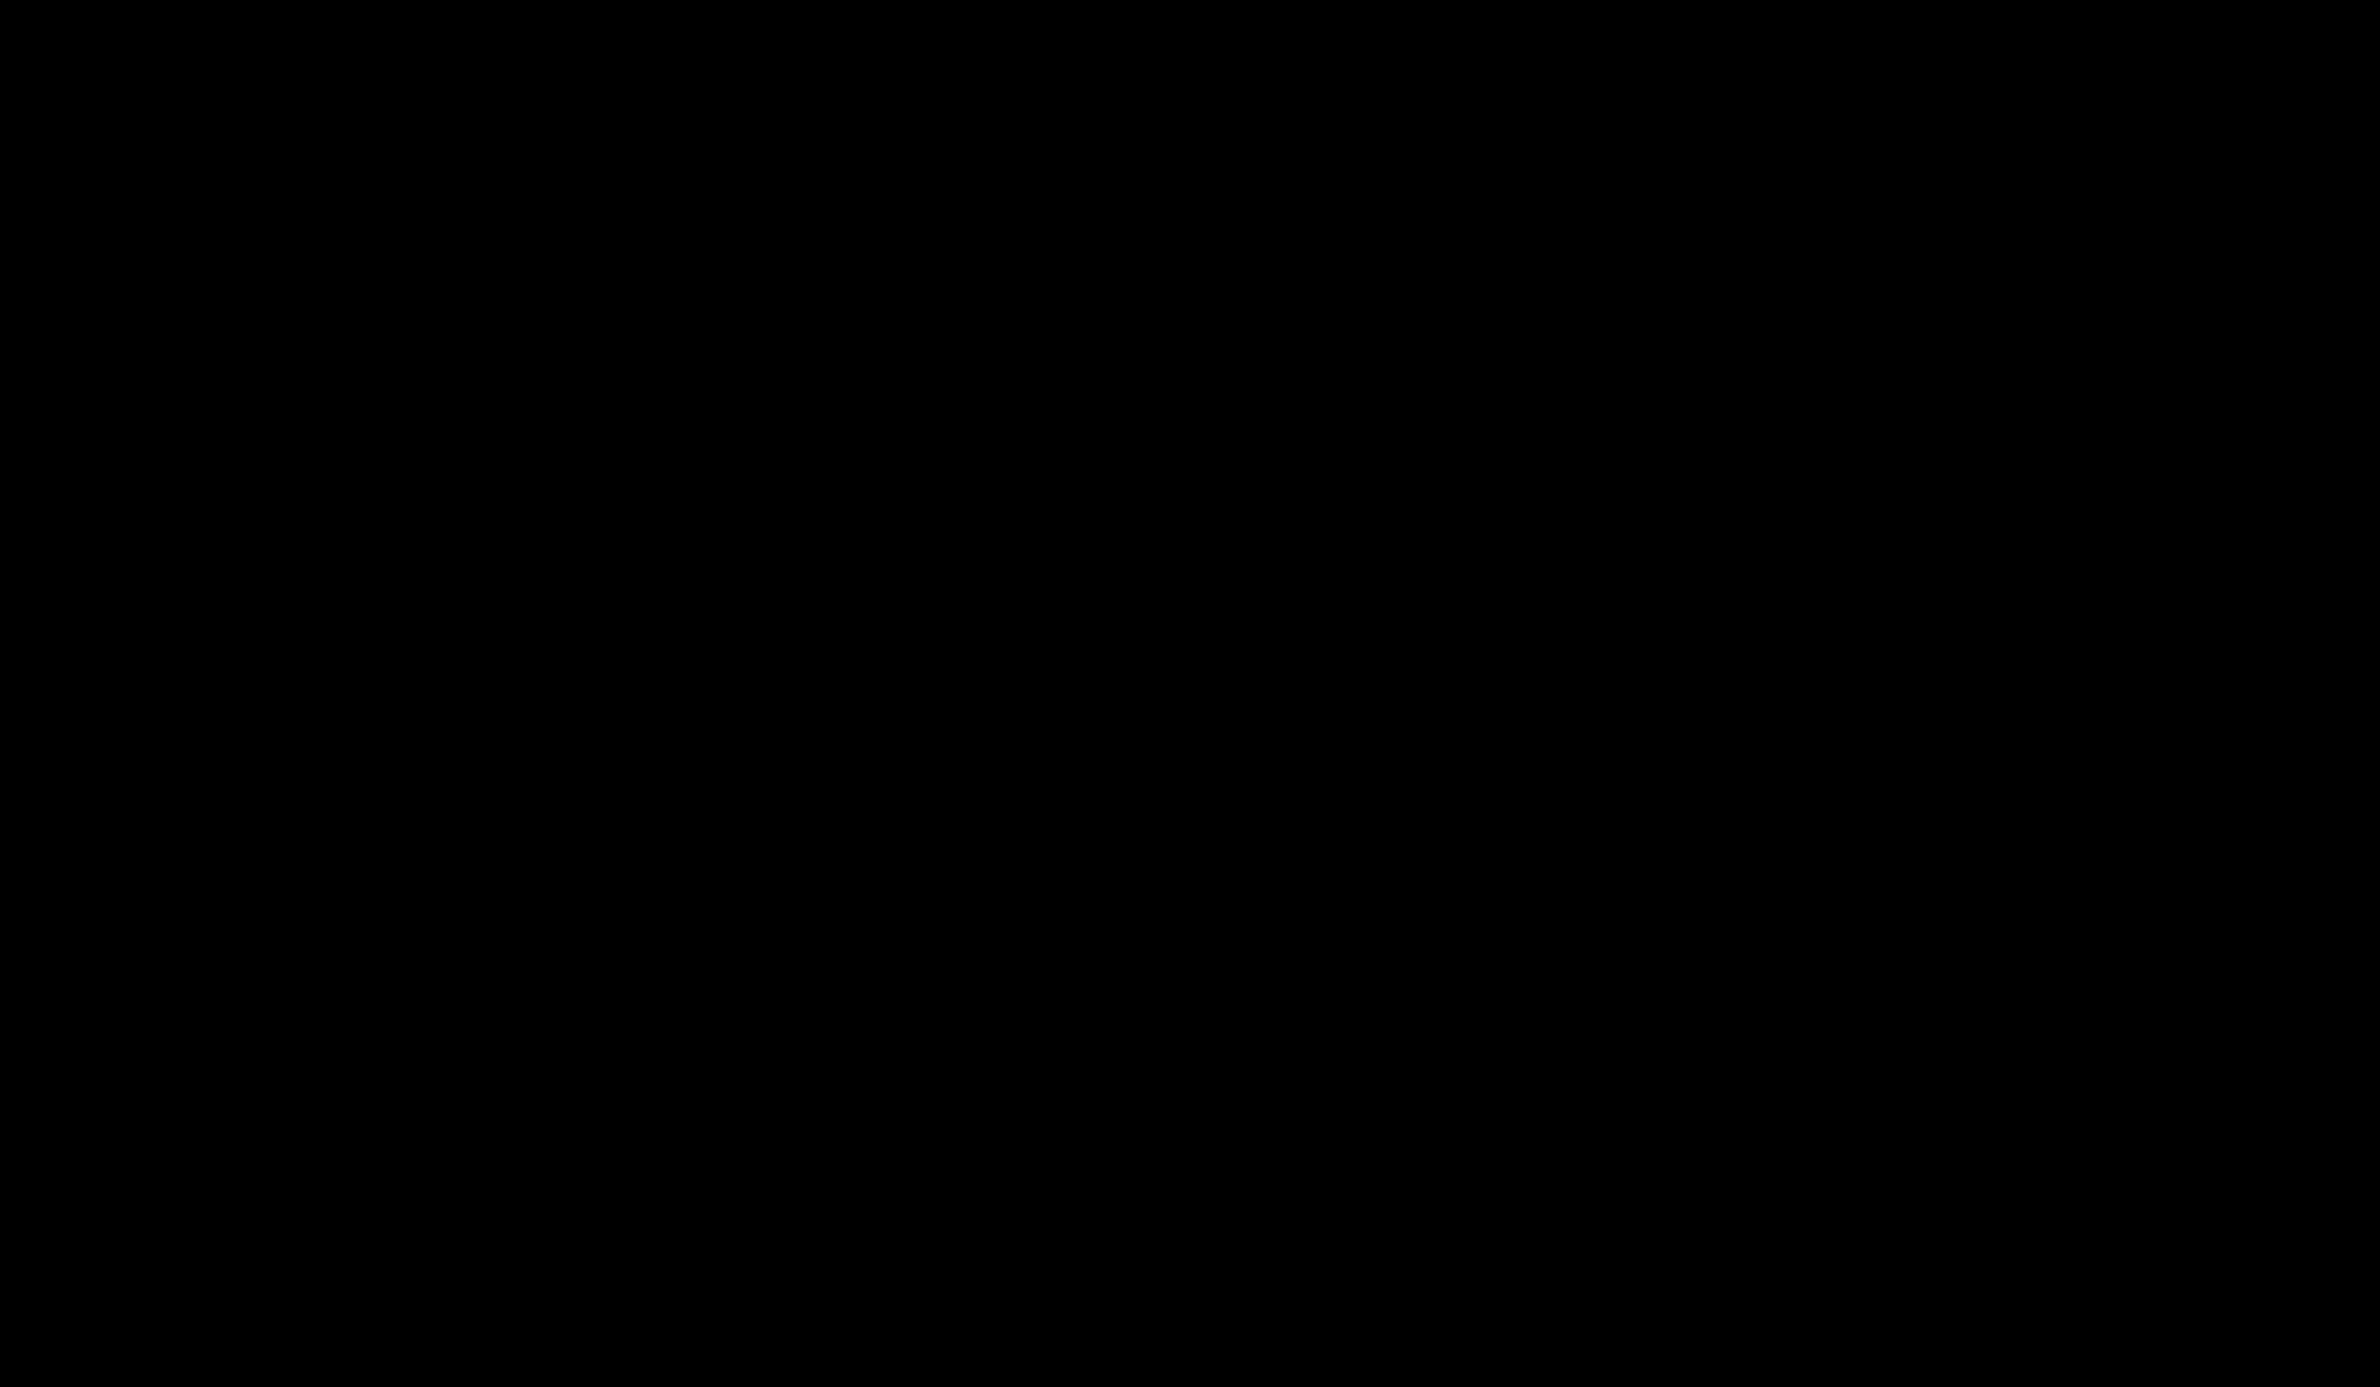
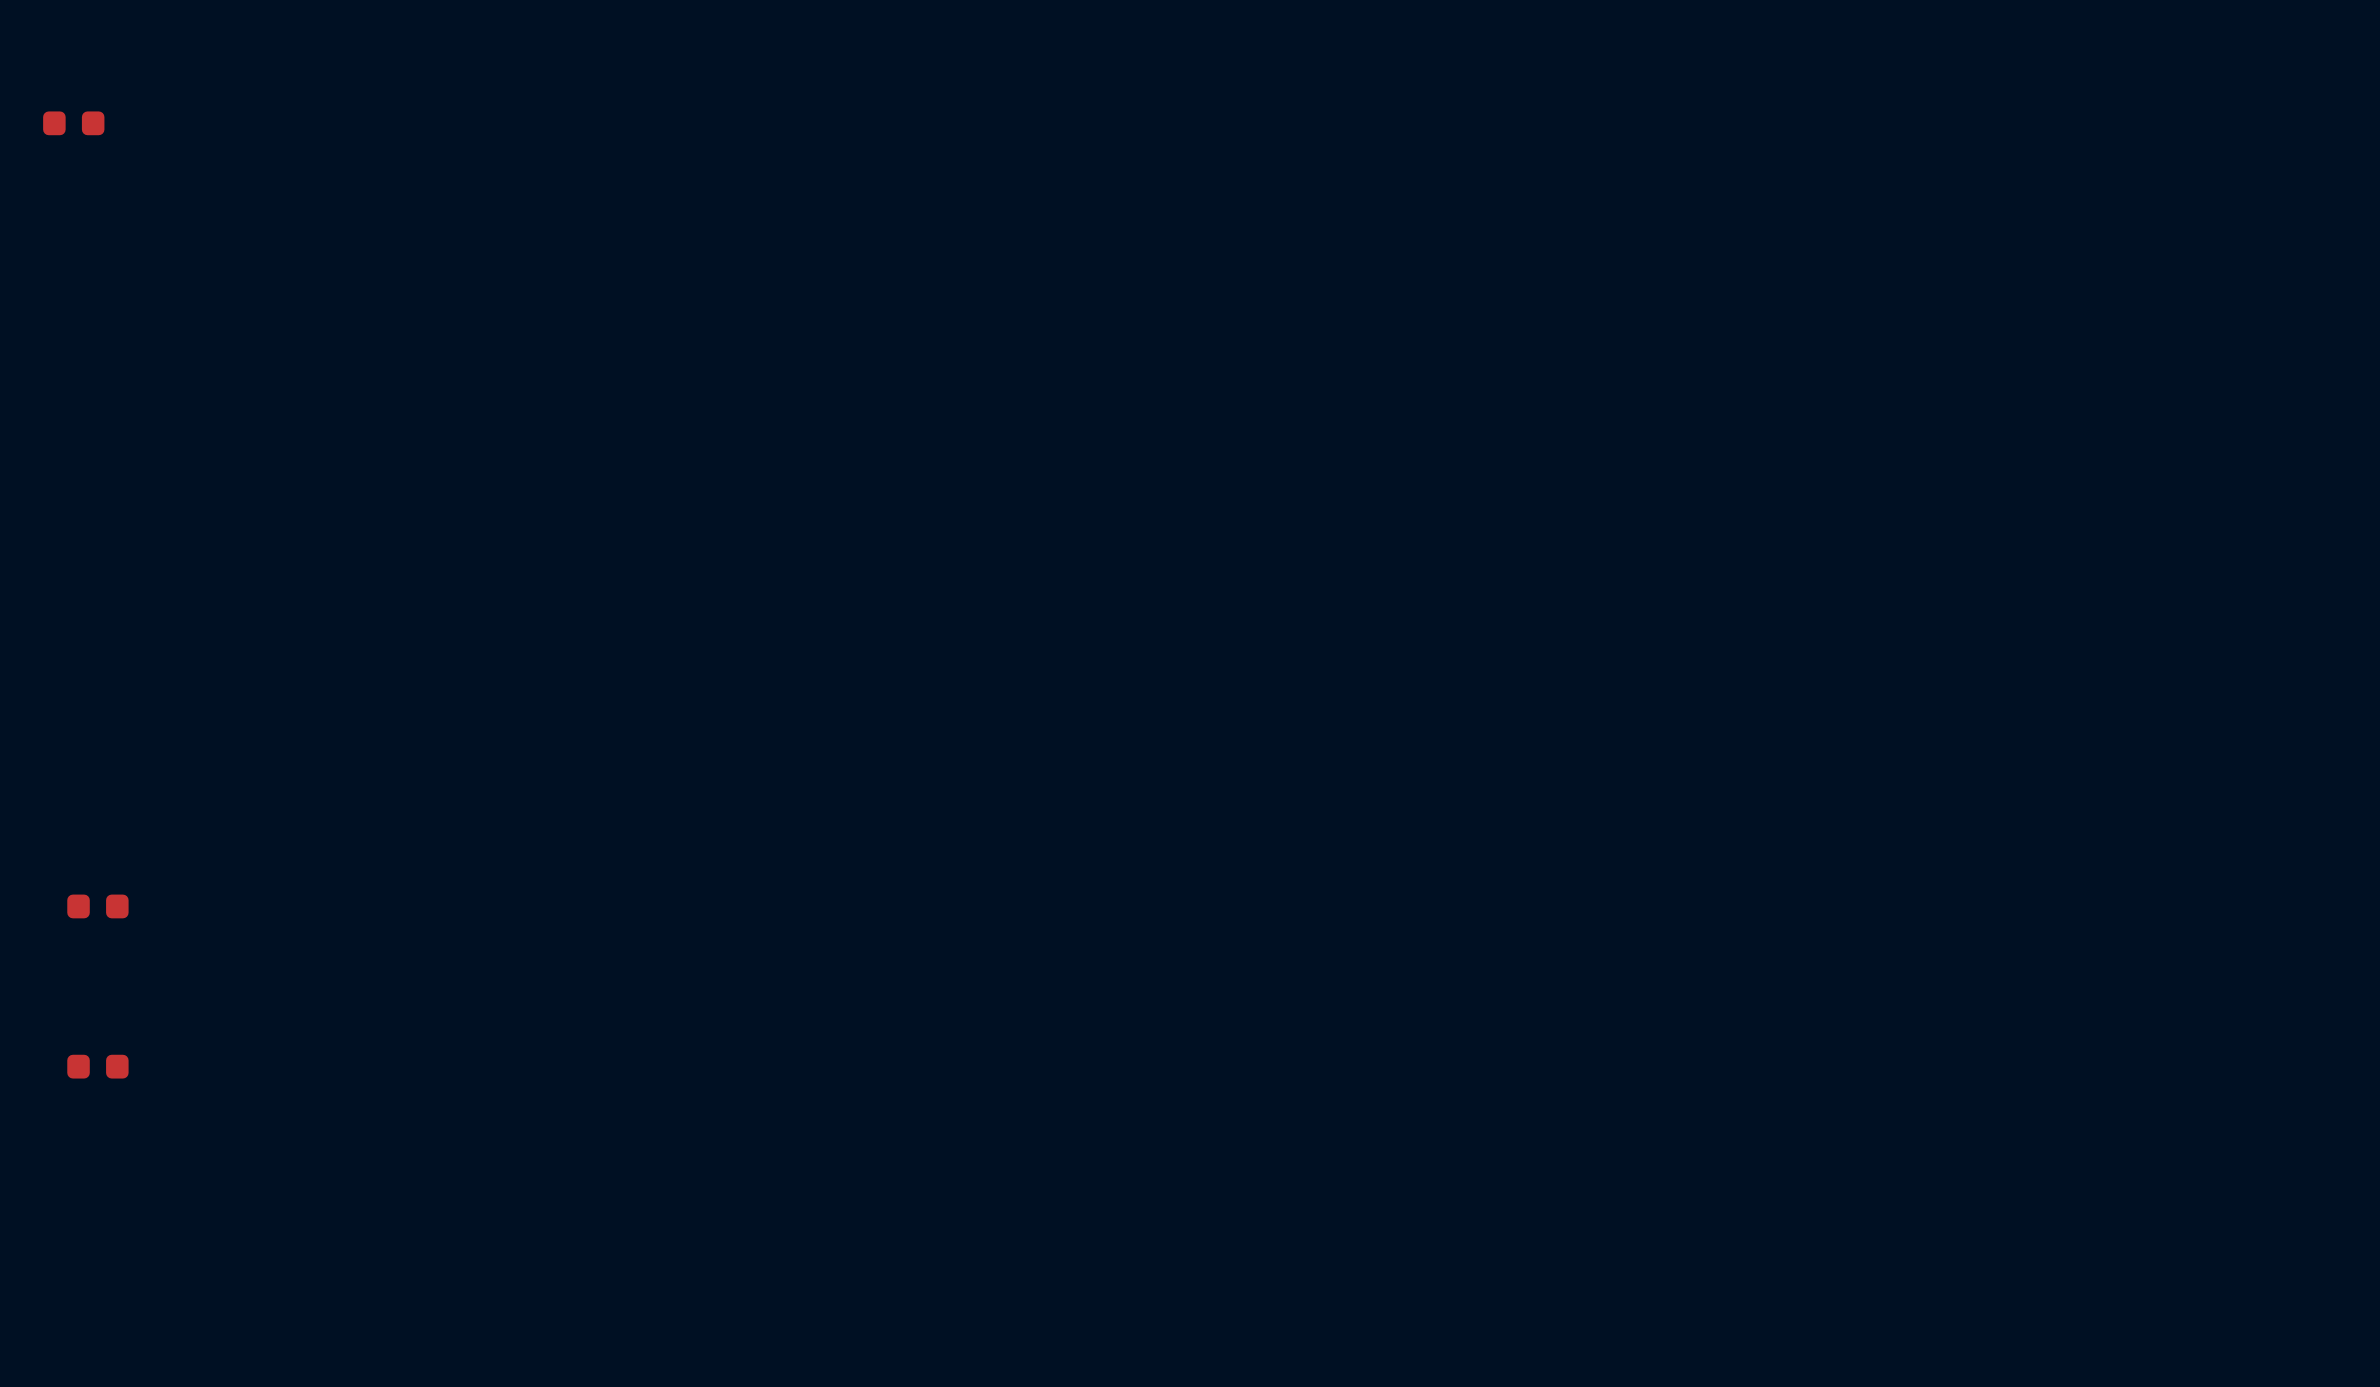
part: none -> (73, 123)
part: none -> (97, 906)
part: none -> (97, 1066)

